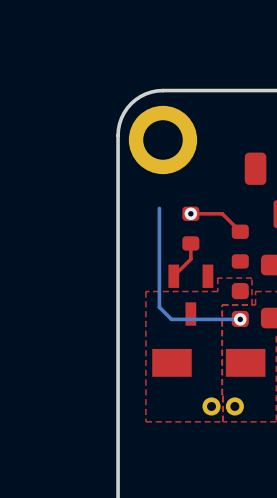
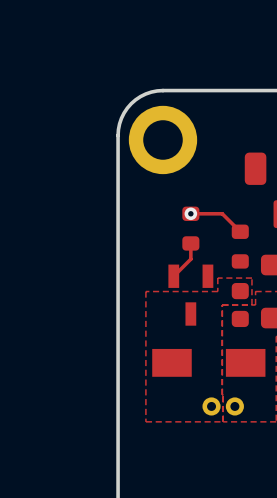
bottom track: (159, 208) (159, 307) (171, 319) (240, 319) -> none
via: (240, 319) -> none

